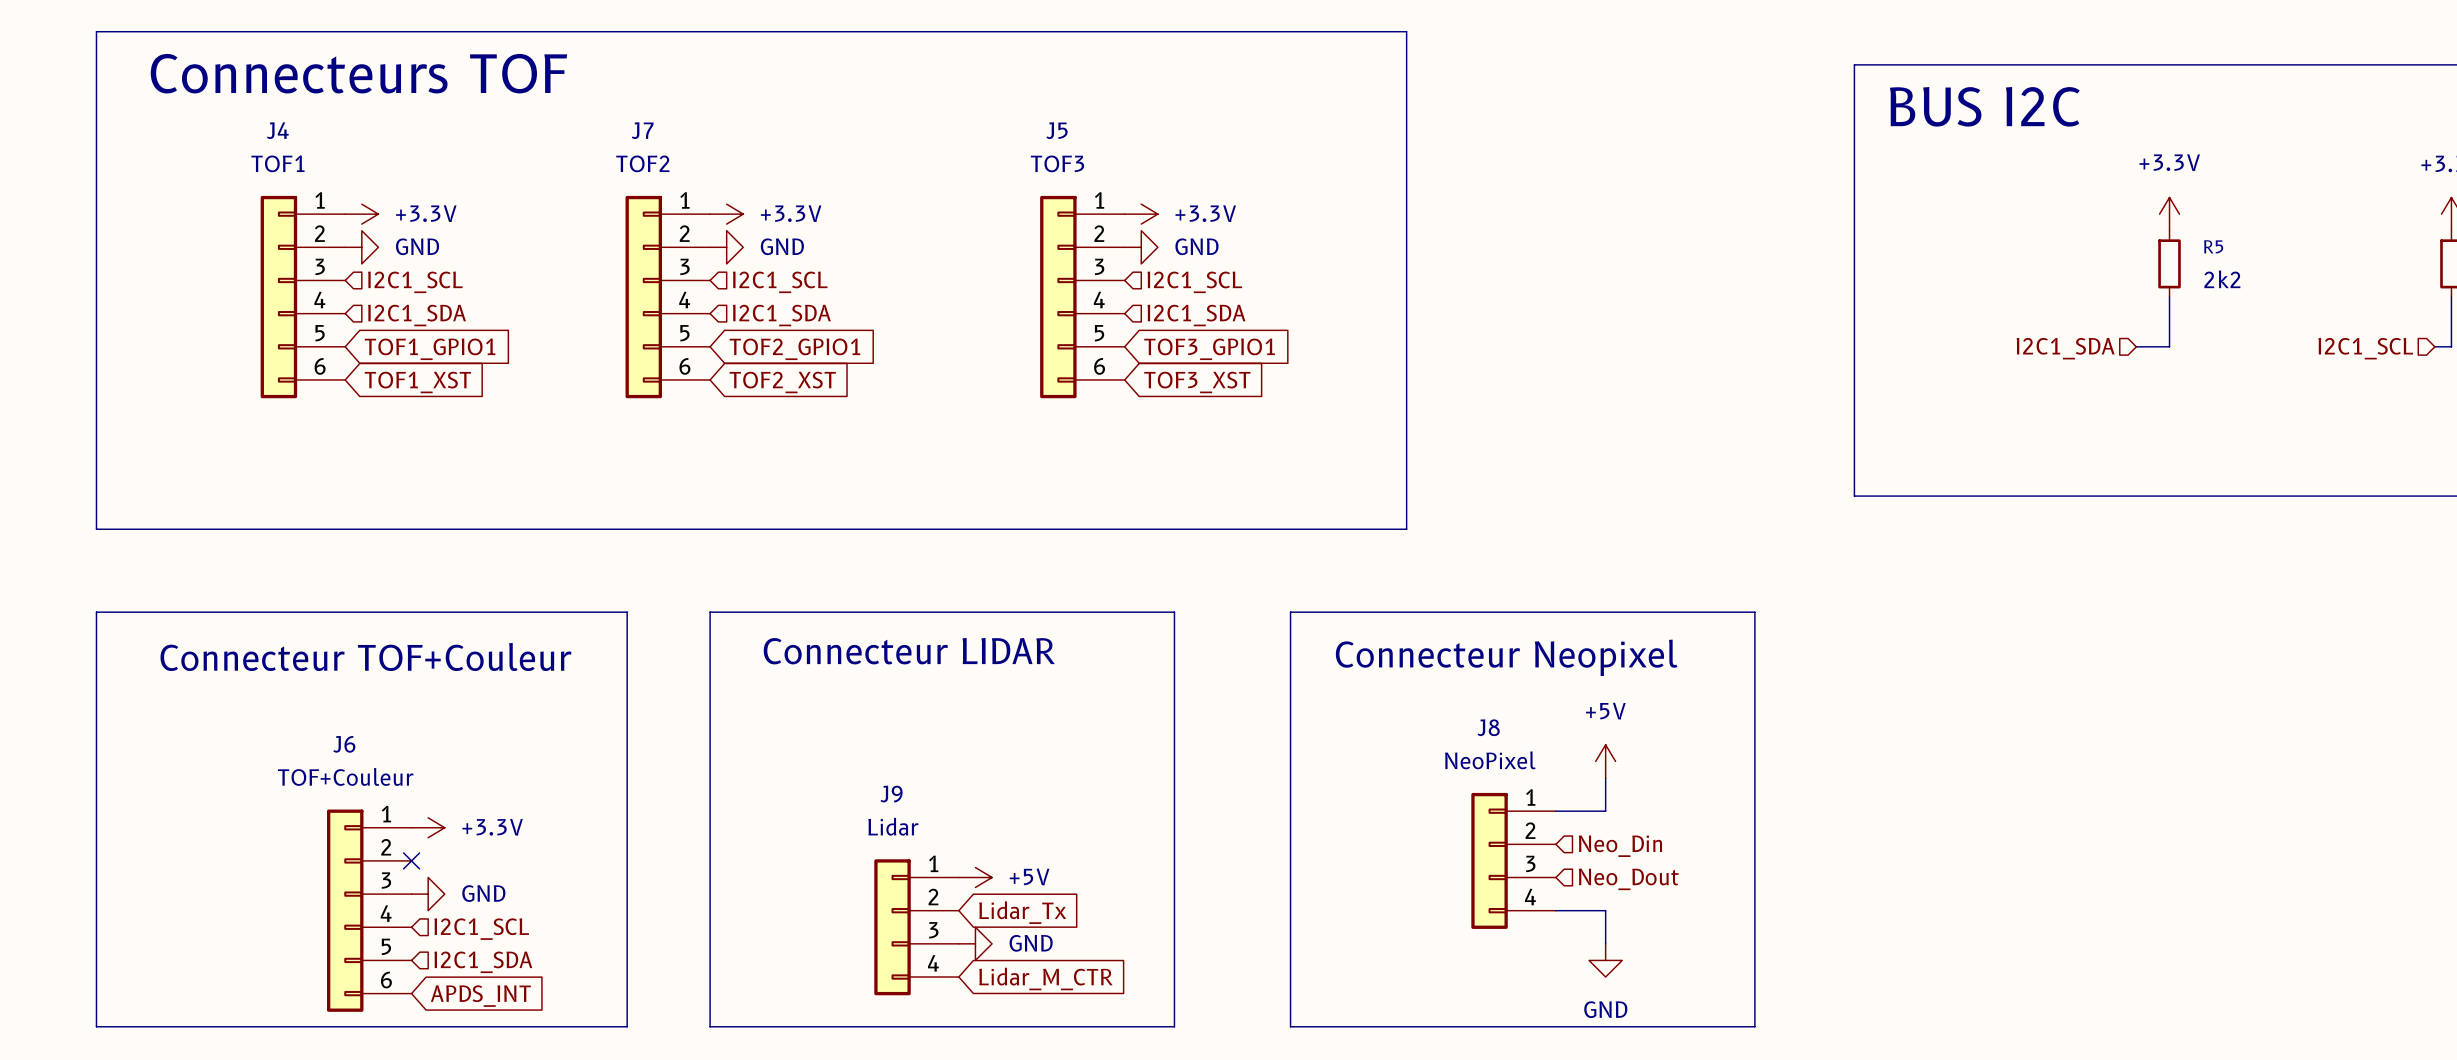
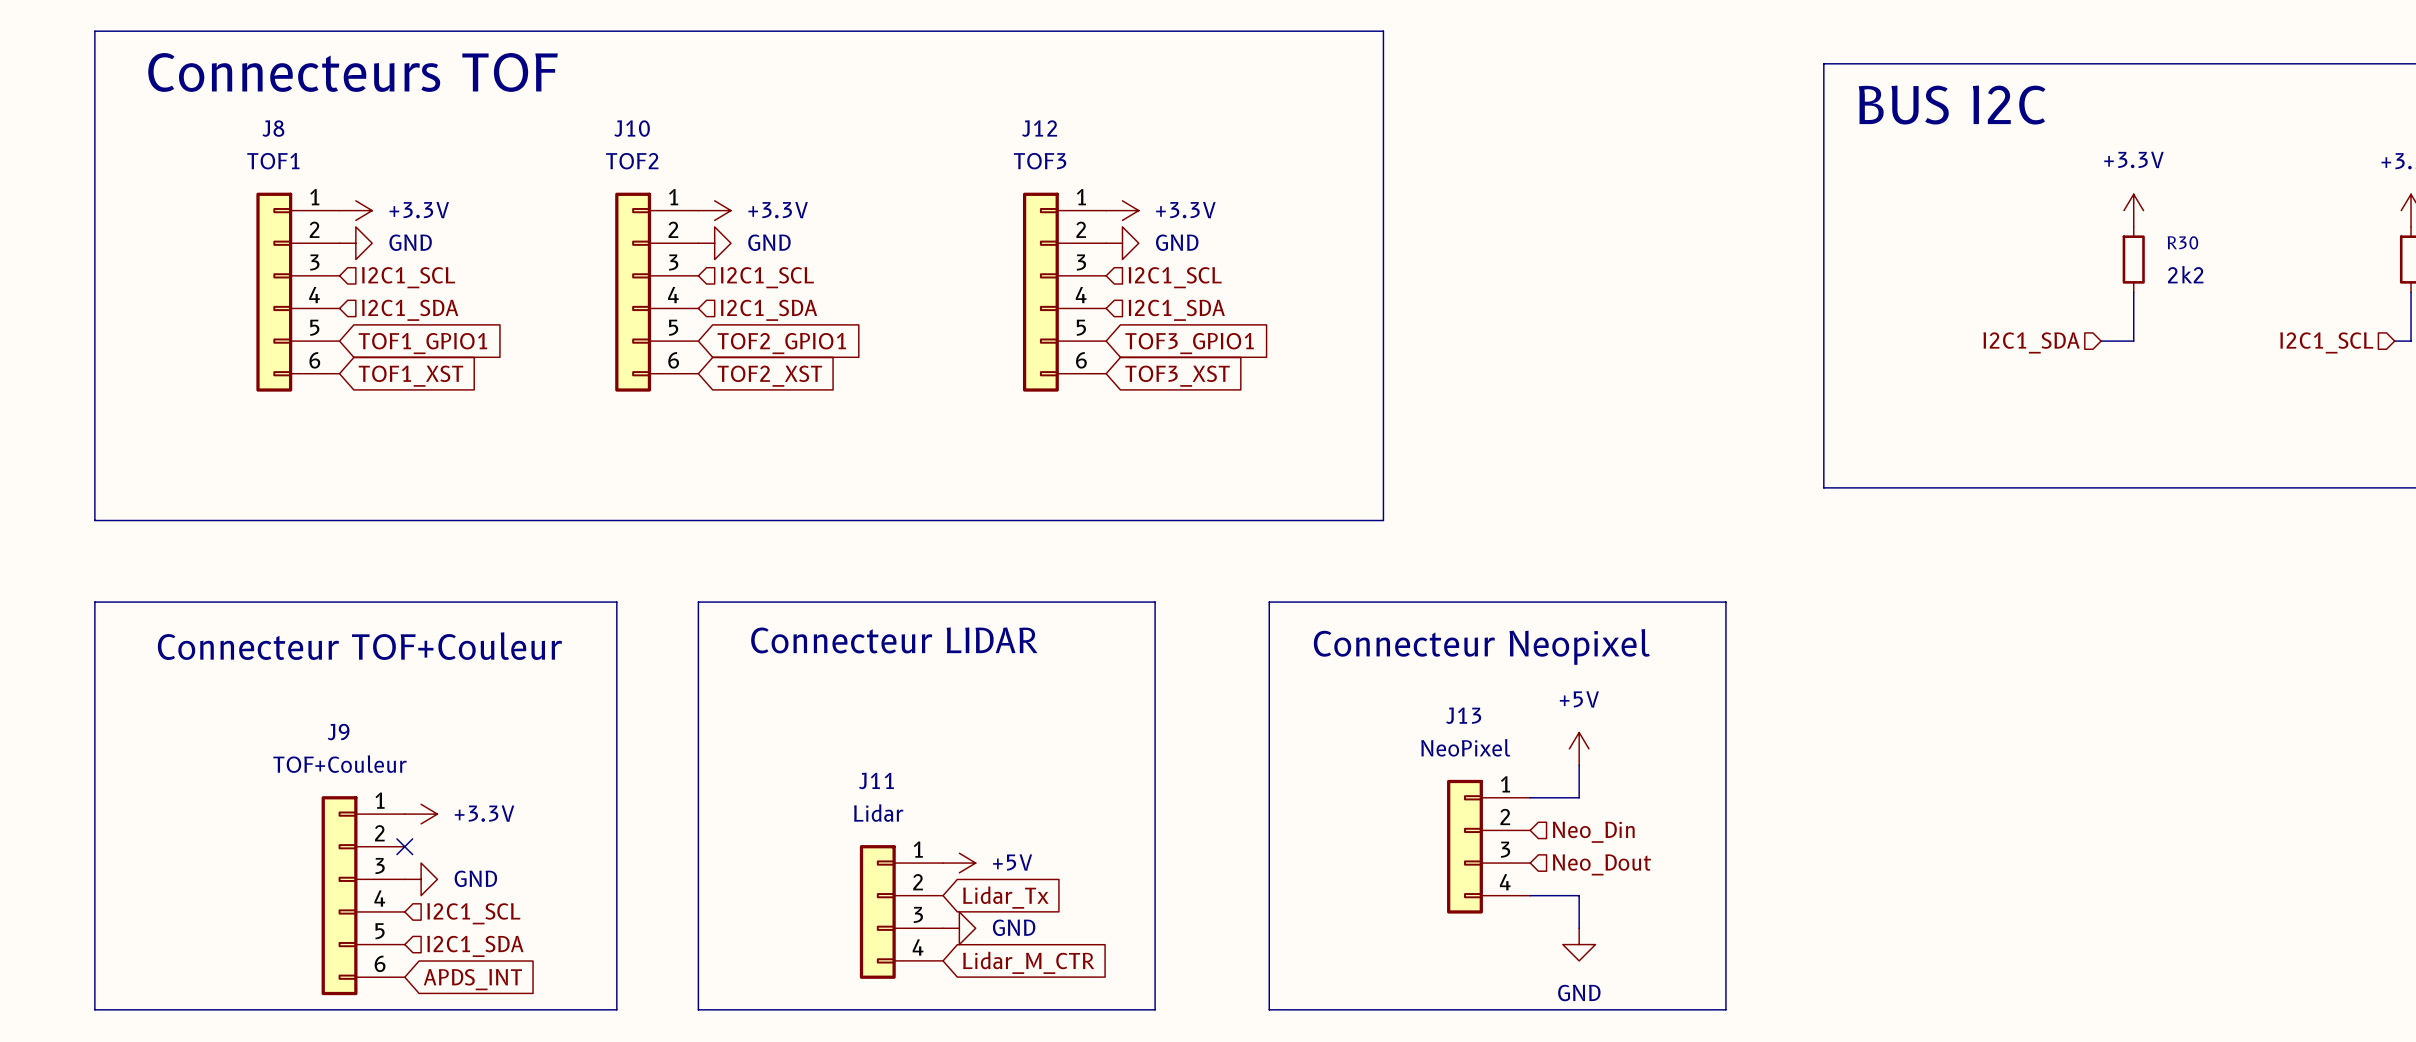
J4 name: J4 (277, 130) -> J8 (273, 128)
J7 name: J7 (642, 130) -> J10 (632, 128)
J5 name: J5 (1056, 130) -> J12 (1039, 128)
R5 name: R5 (2213, 246) -> R30 (2182, 242)
J8 name: J8 (1488, 727) -> J13 (1463, 715)
J6 name: J6 (344, 744) -> J9 (338, 732)
J9 name: J9 (891, 794) -> J11 (876, 780)

